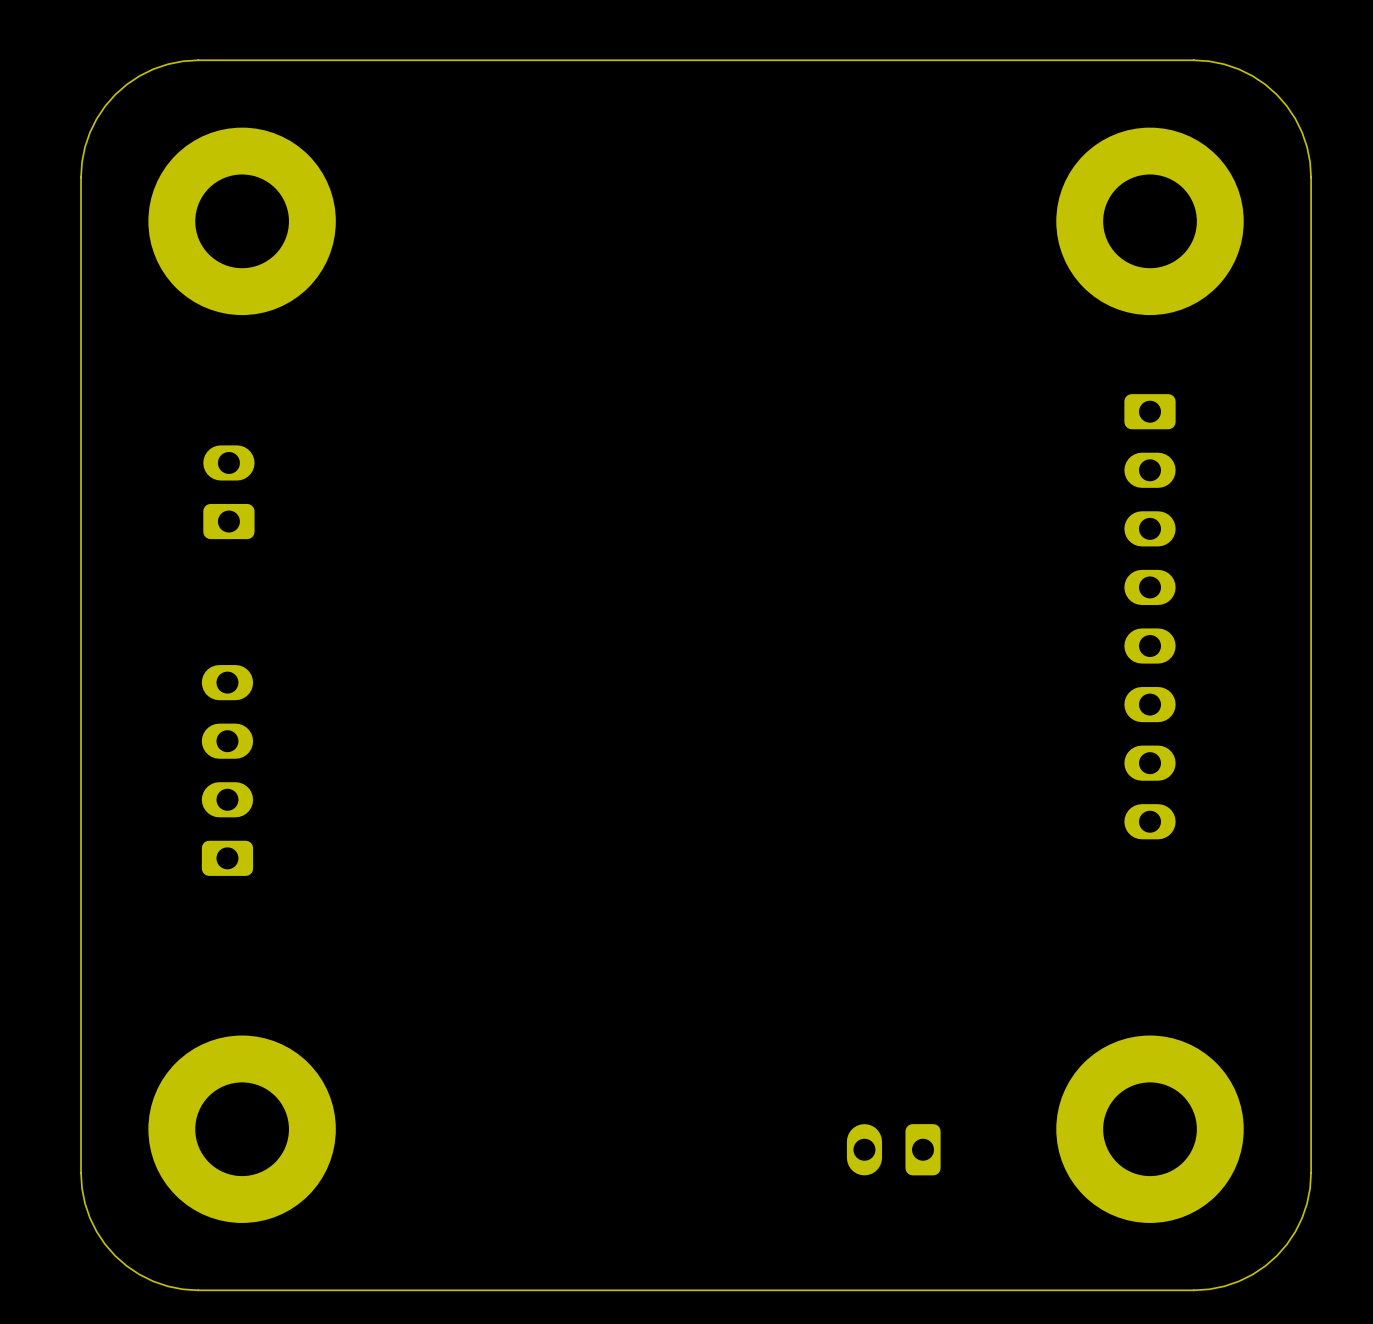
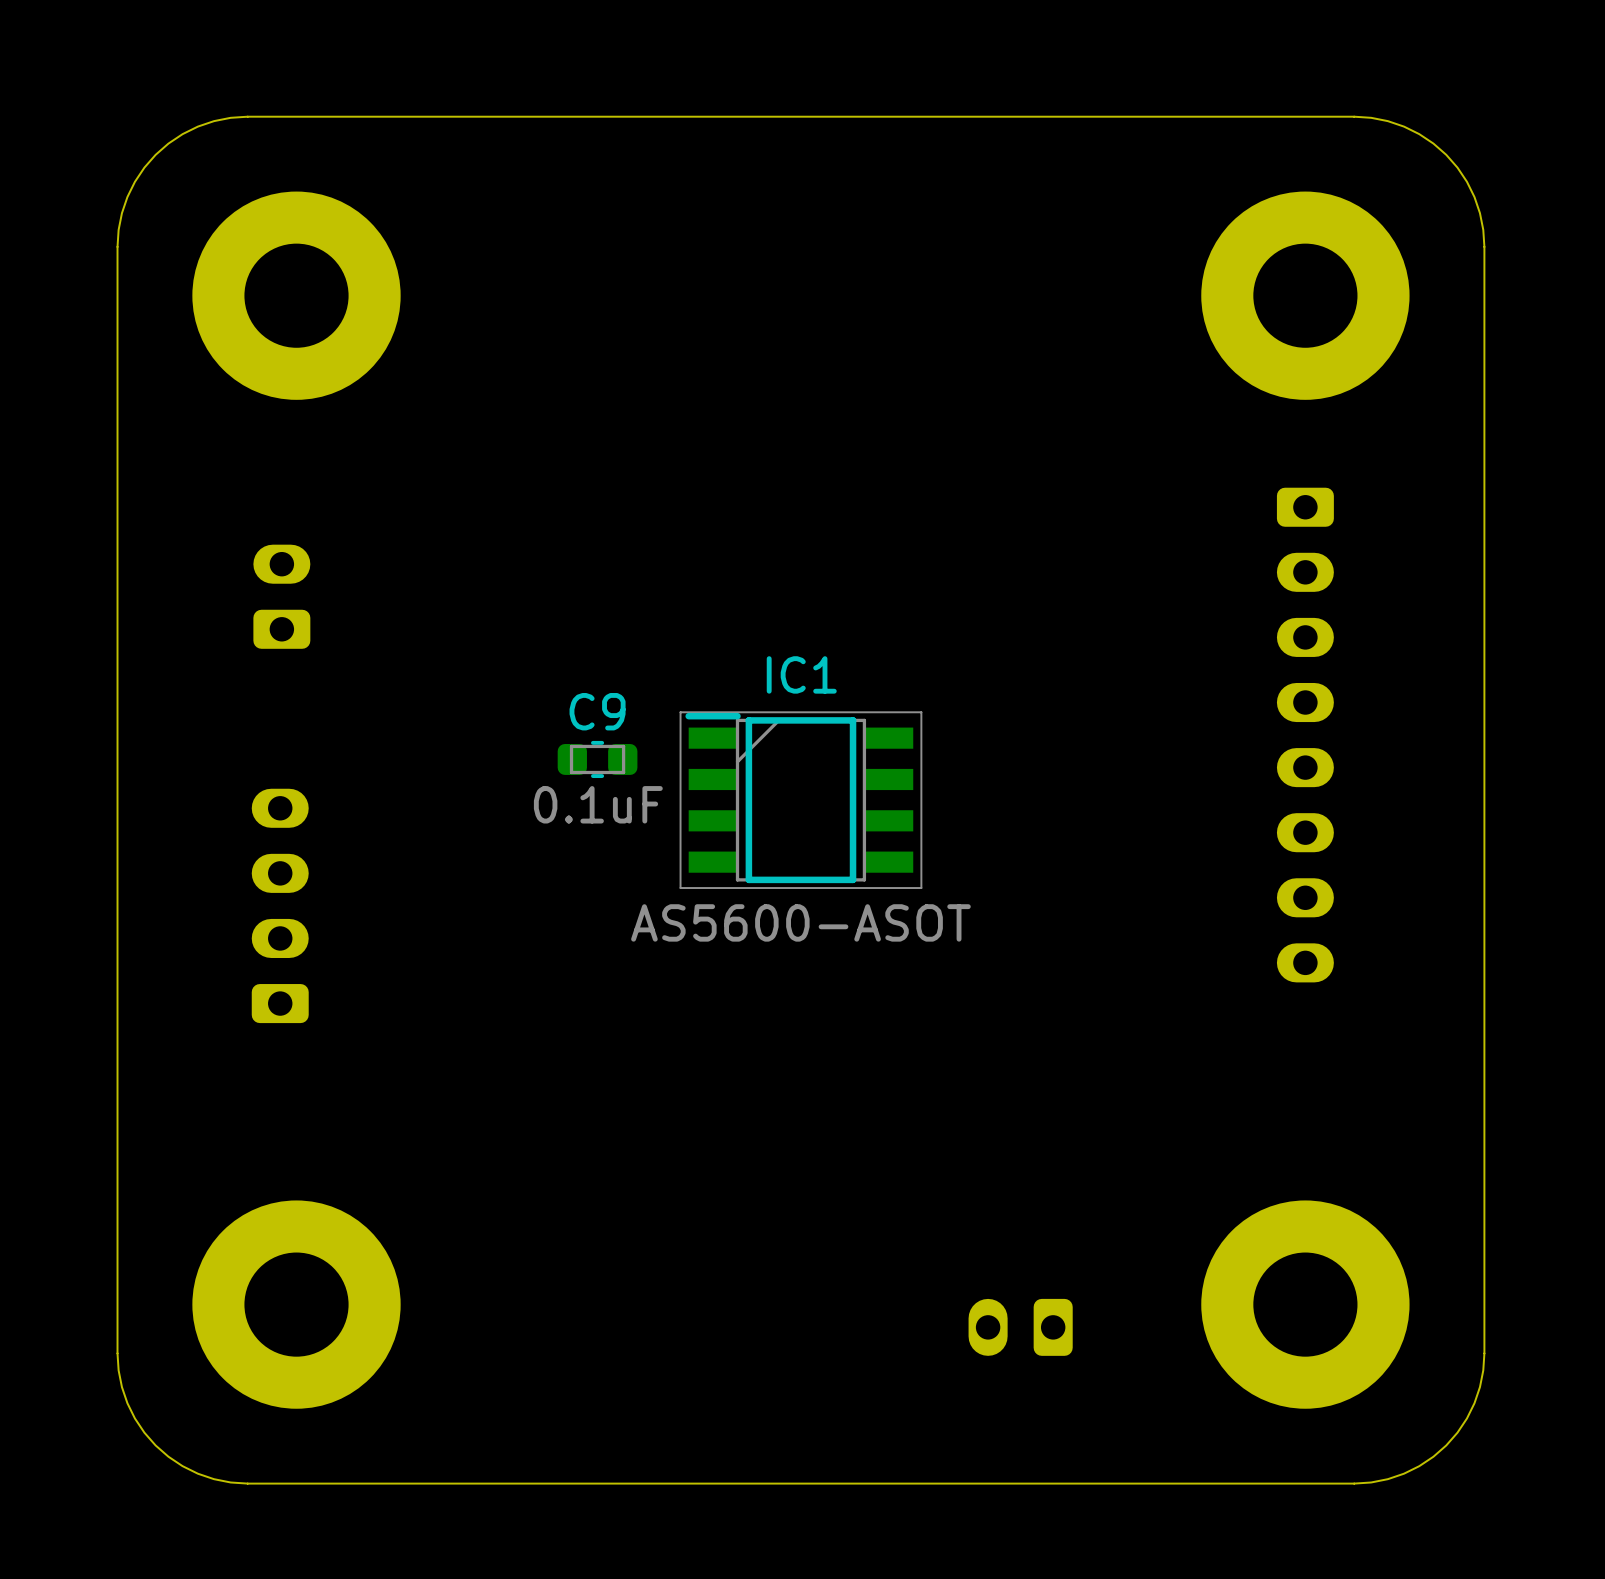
C9: none -> 0.1uF (597, 759)
IC1: none -> AS5600-ASOT (800, 800)

